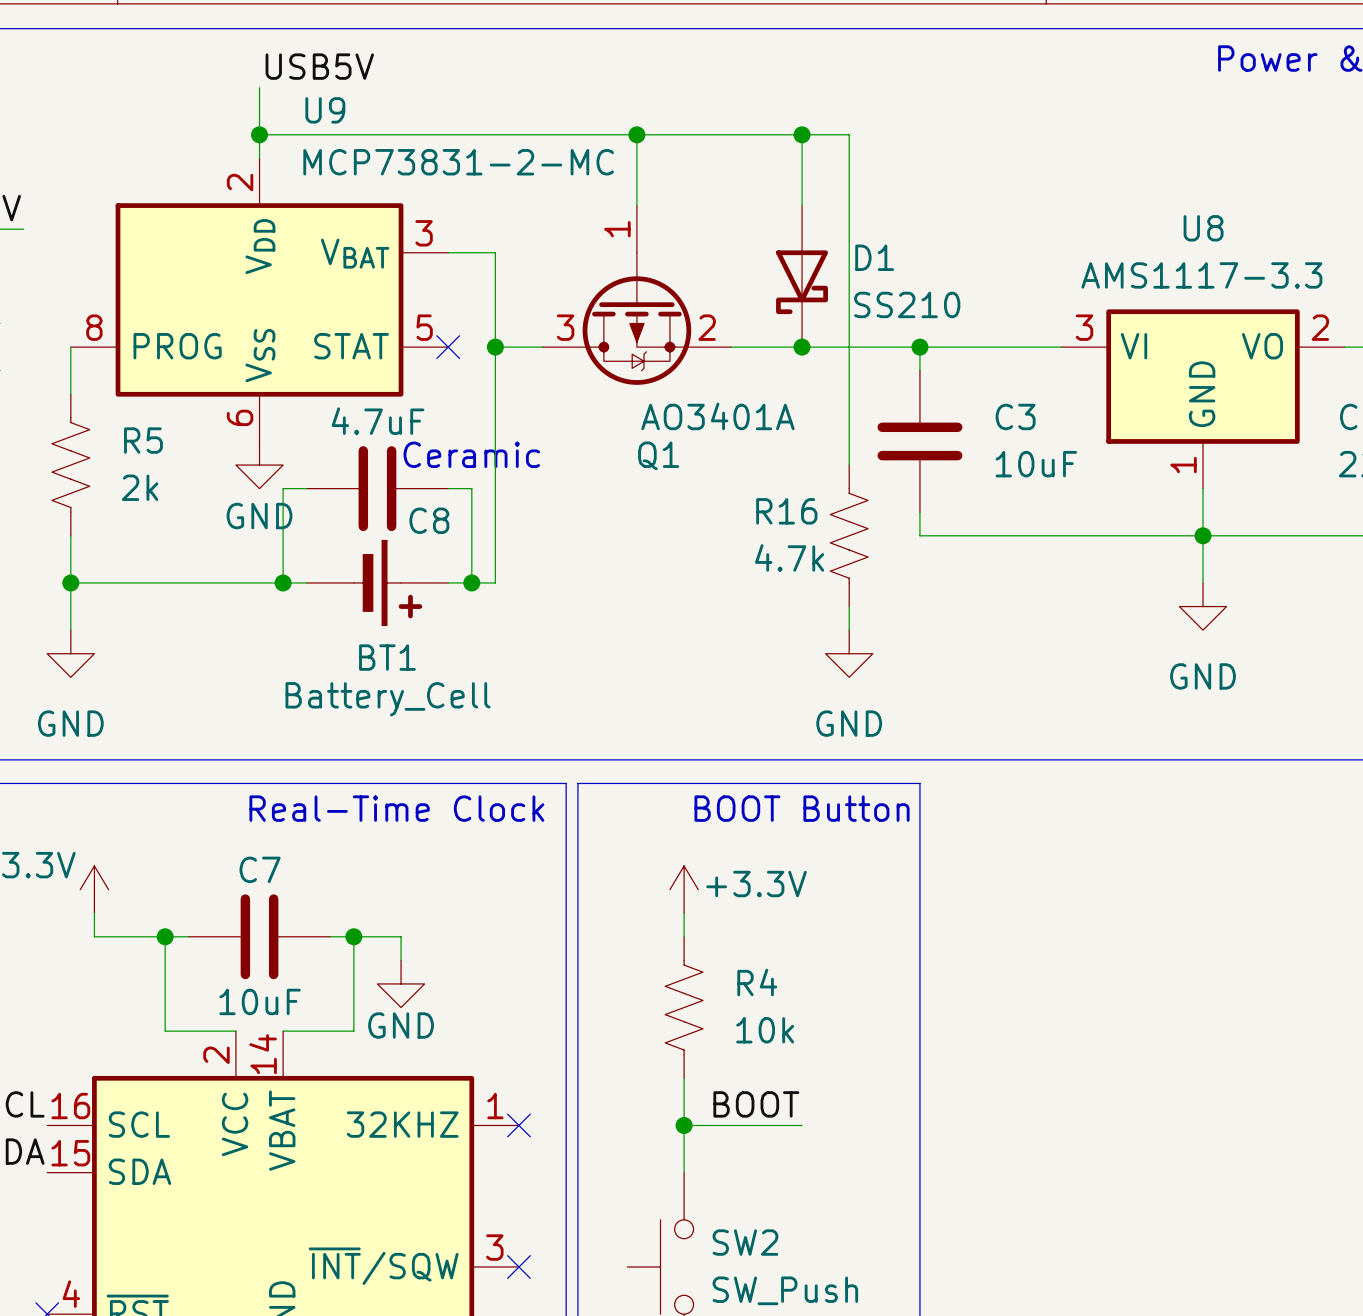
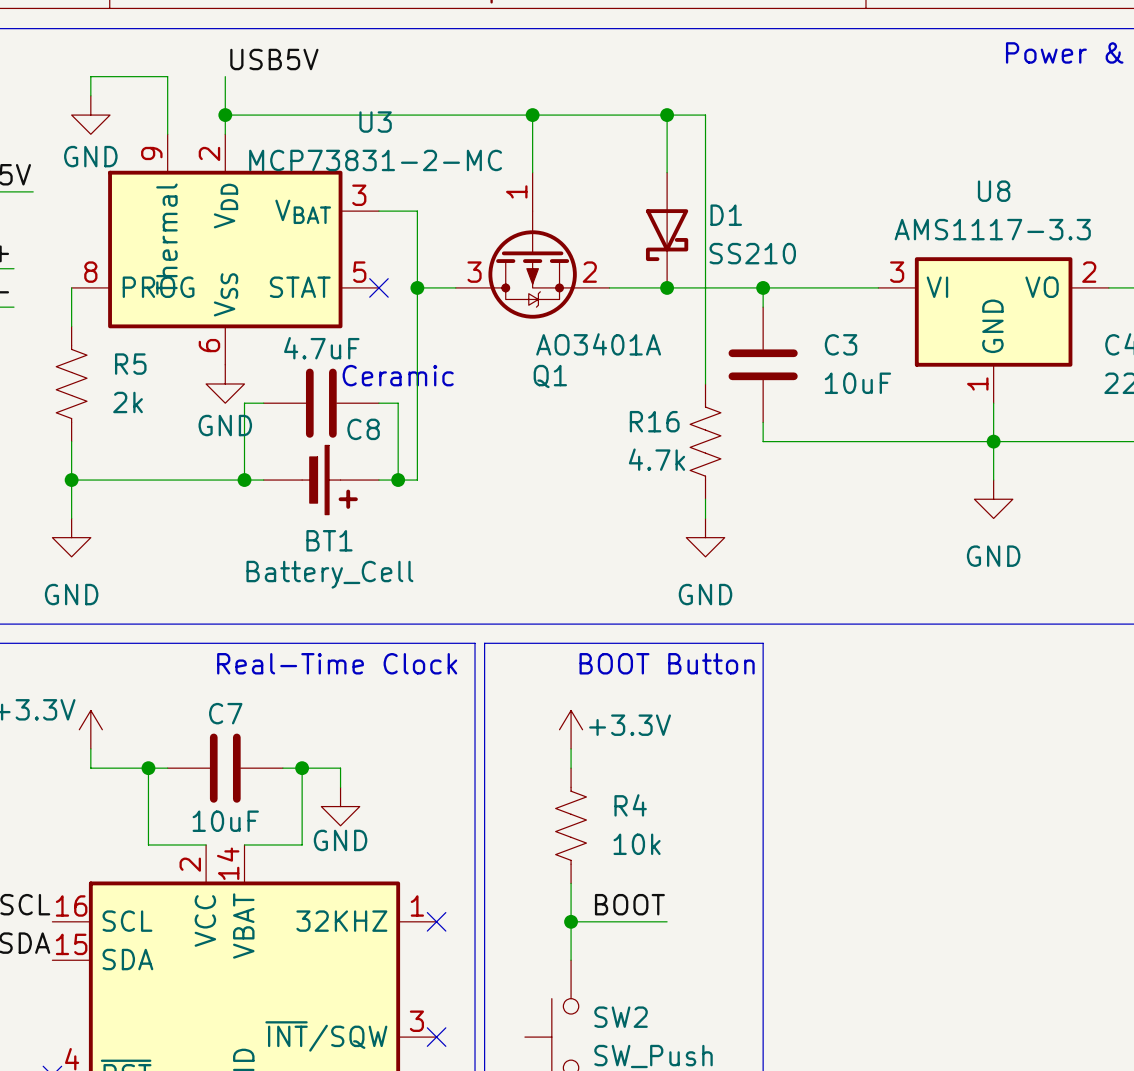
wire: none -> (90, 95) (90, 76) (167, 76) (167, 134)
power symbol: none -> GND (90, 115)
U9: MCP73831-2-MC (259, 299) -> none
U3: none -> MCP73831-2-MC (225, 249)

